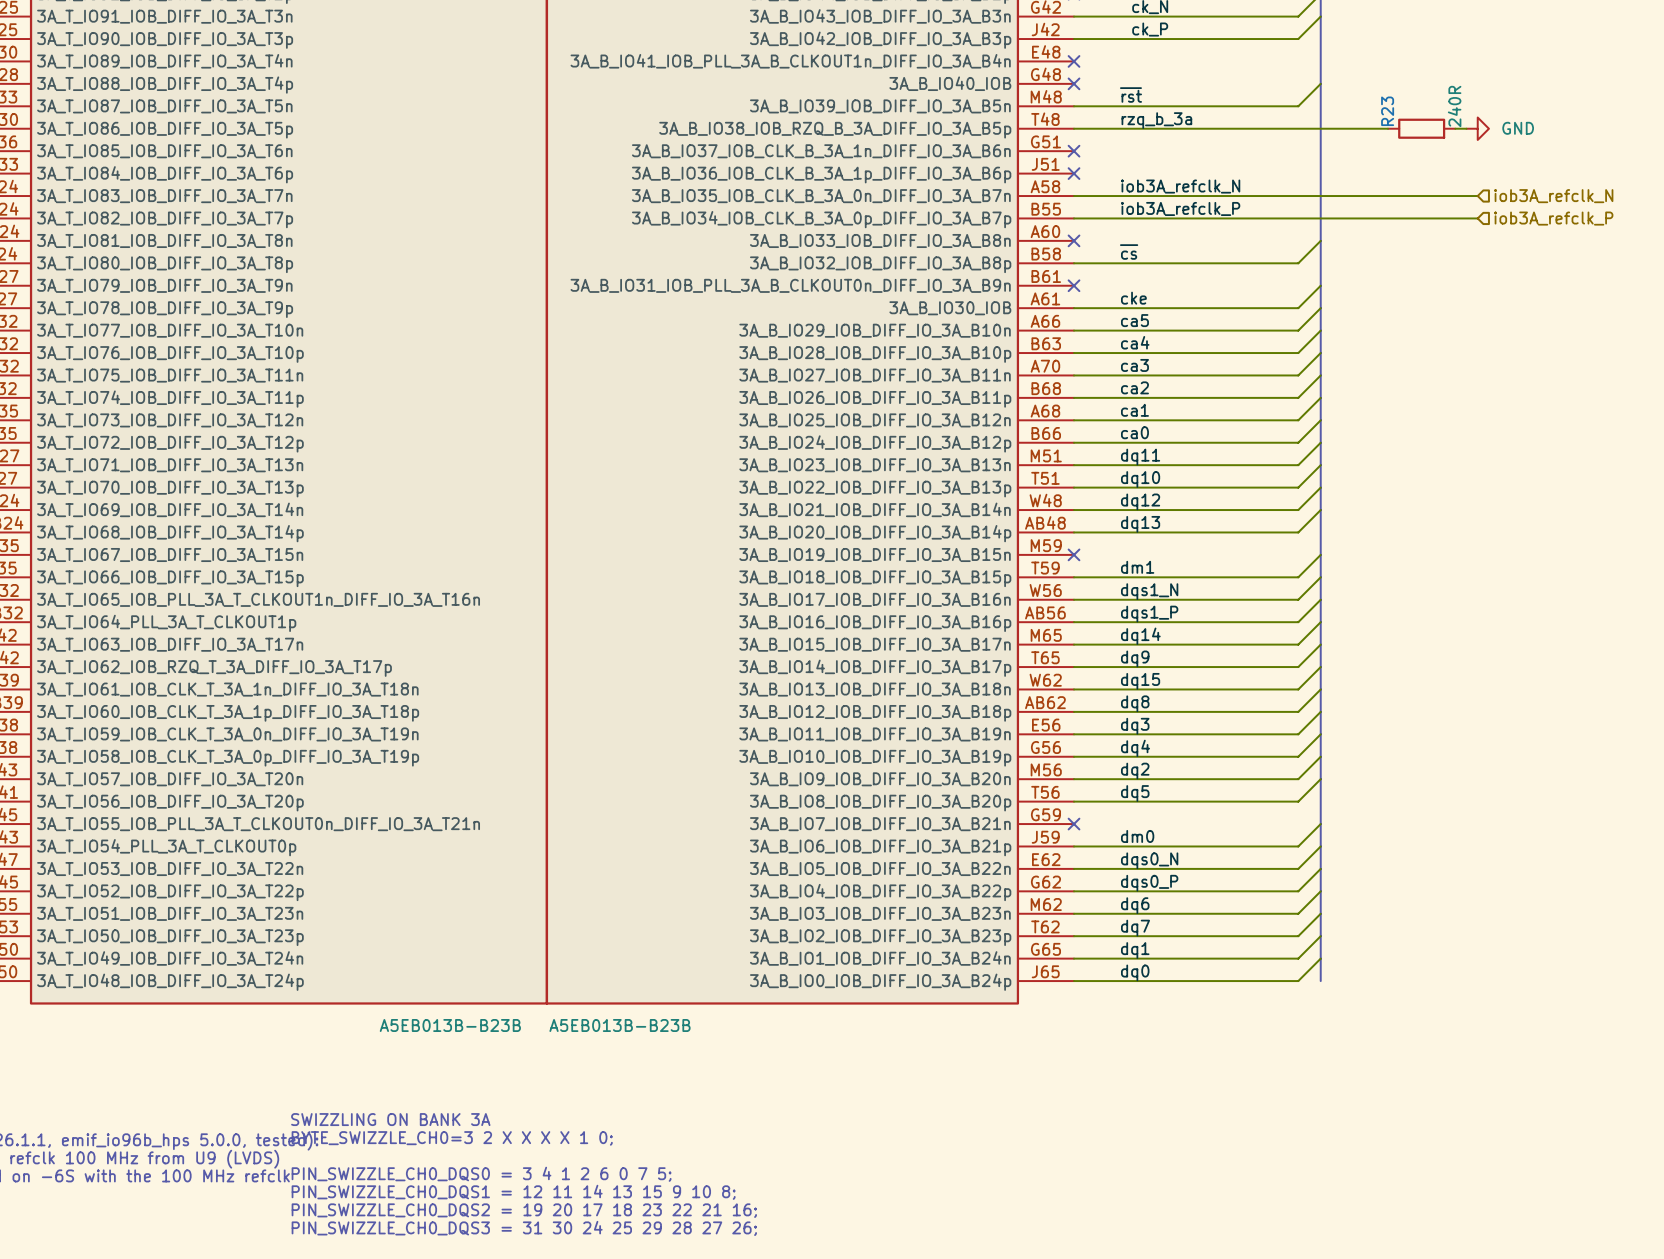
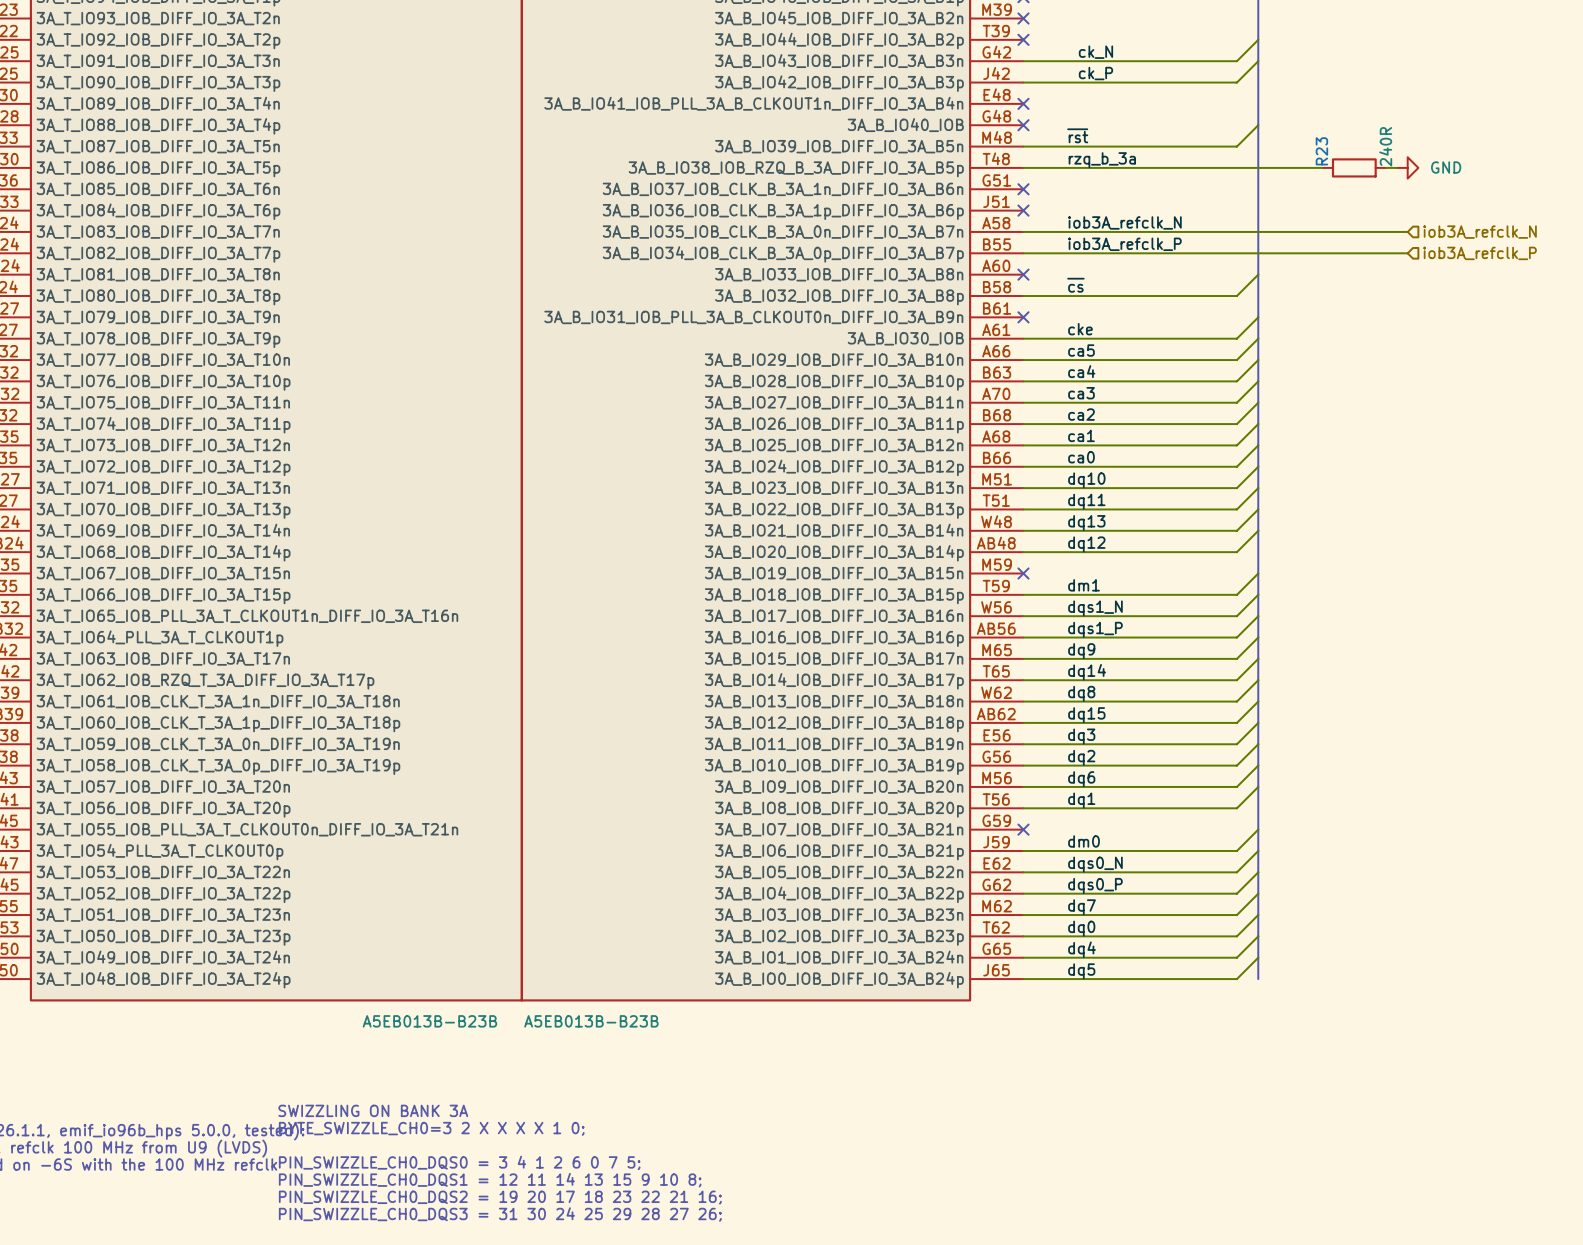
label: dq11 (1140, 457) -> dq10 (1086, 480)
label: dq10 (1140, 479) -> dq11 (1086, 501)
label: dq12 (1140, 501) -> dq13 (1086, 523)
label: dq13 (1140, 524) -> dq12 (1086, 544)
label: dq14 (1140, 636) -> dq9 (1081, 651)
label: dq9 (1135, 658) -> dq14 (1087, 672)
label: dq15 (1140, 681) -> dq8 (1081, 693)
label: dq8 (1135, 703) -> dq15 (1086, 715)
label: dq4 (1135, 748) -> dq2 (1081, 757)
label: dq2 (1135, 771) -> dq6 (1081, 779)
label: dq5 (1135, 793) -> dq1 (1081, 800)
label: dq6 (1135, 905) -> dq7 (1082, 907)
label: dq7 (1135, 928) -> dq0 (1081, 928)
label: dq1 (1135, 950) -> dq4 (1082, 949)
label: dq0 (1135, 972) -> dq5 (1081, 971)

